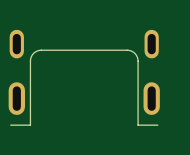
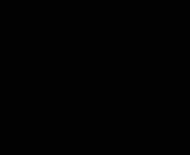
part: (84, 77) -> none

